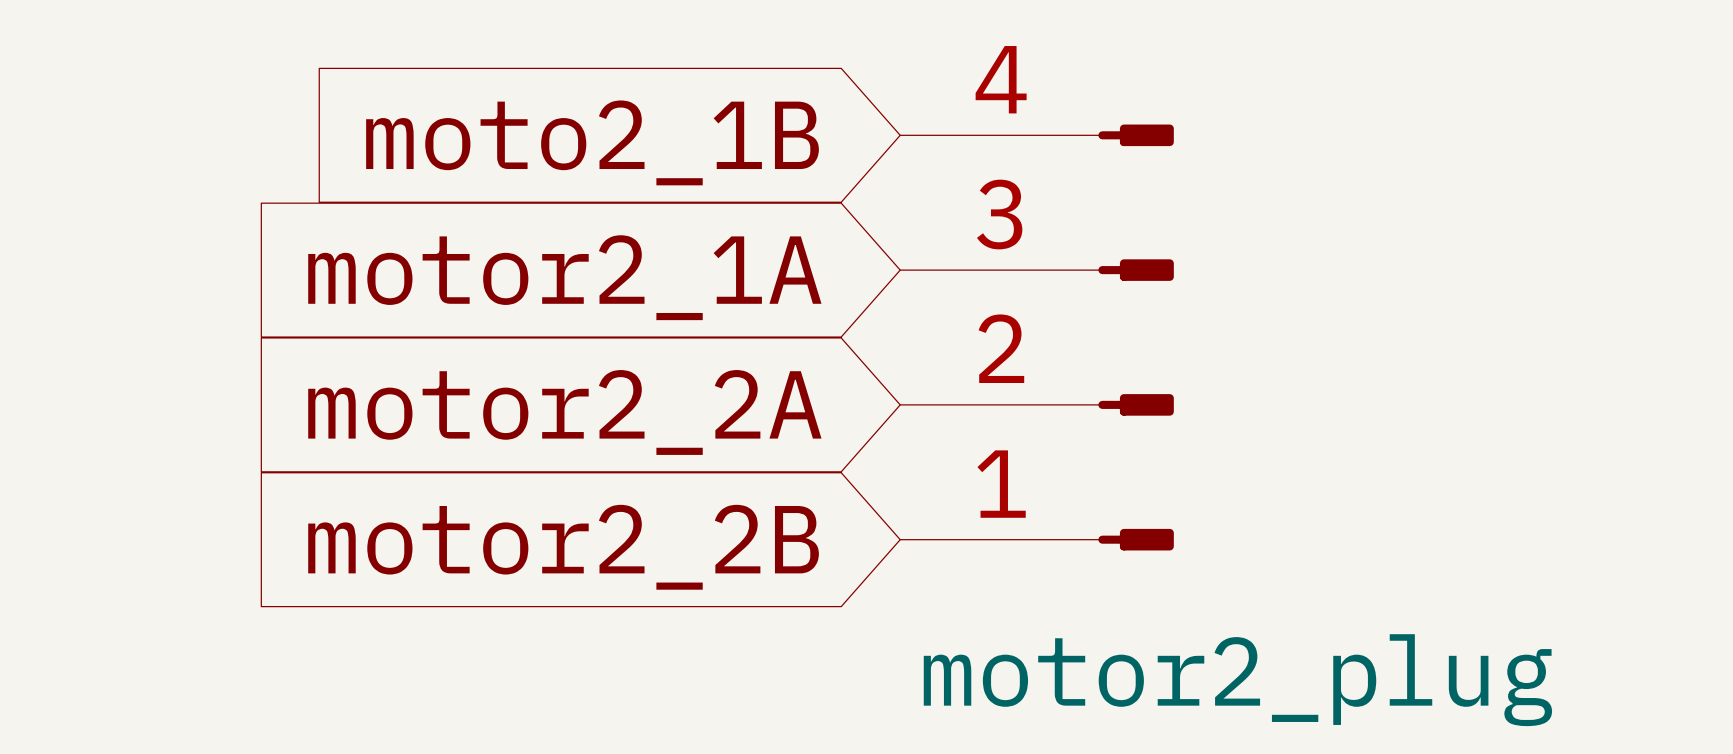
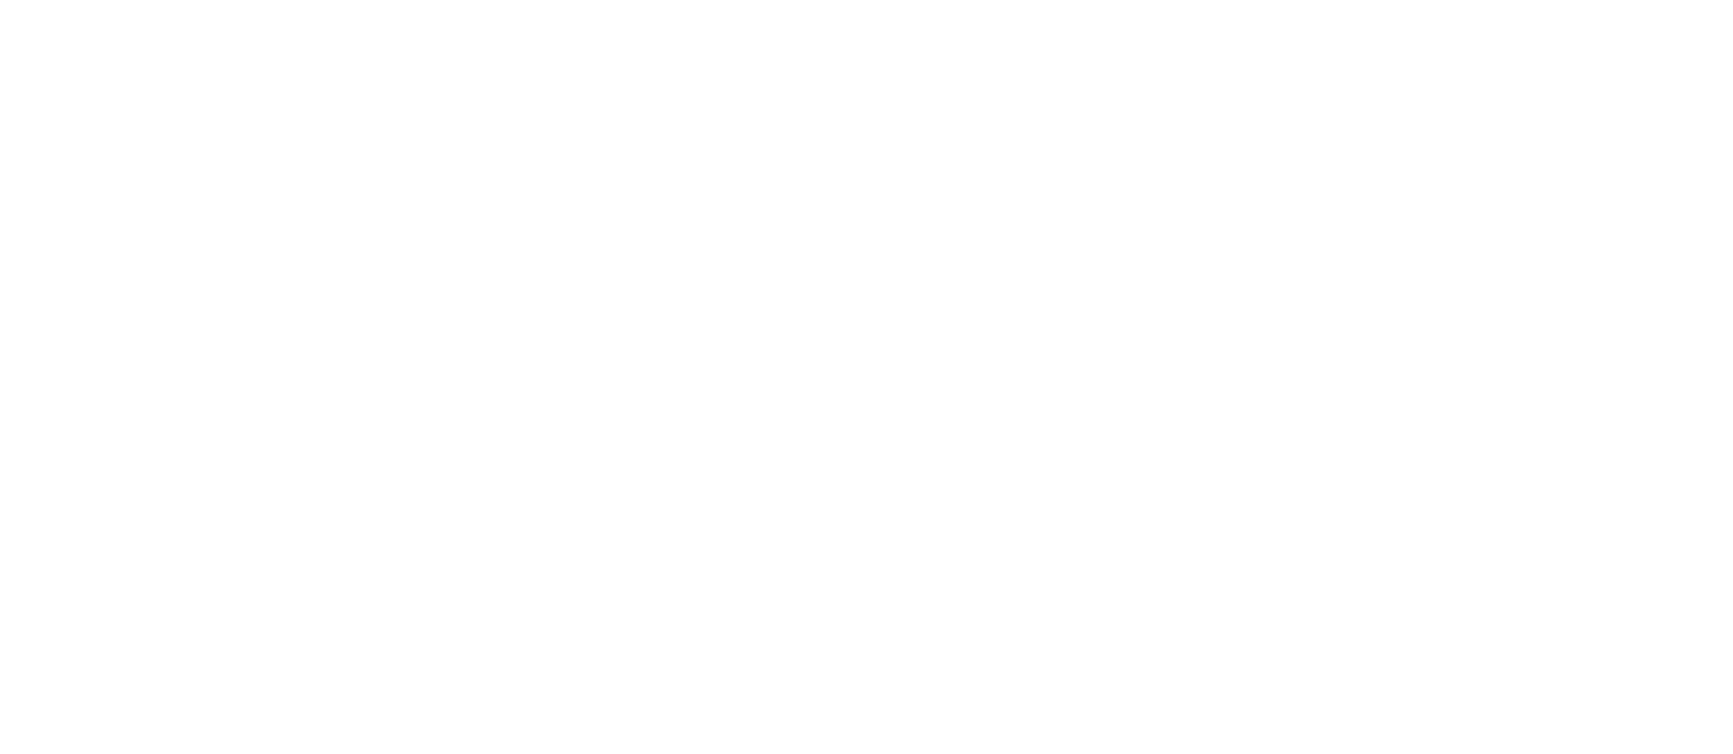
global label: moto2_1B (592, 142) -> none
global label: motor2_1A (564, 277) -> none
motor2_plug: (1037, 337) -> none
global label: motor2_2A (564, 412) -> none
global label: motor2_2B (563, 547) -> none

